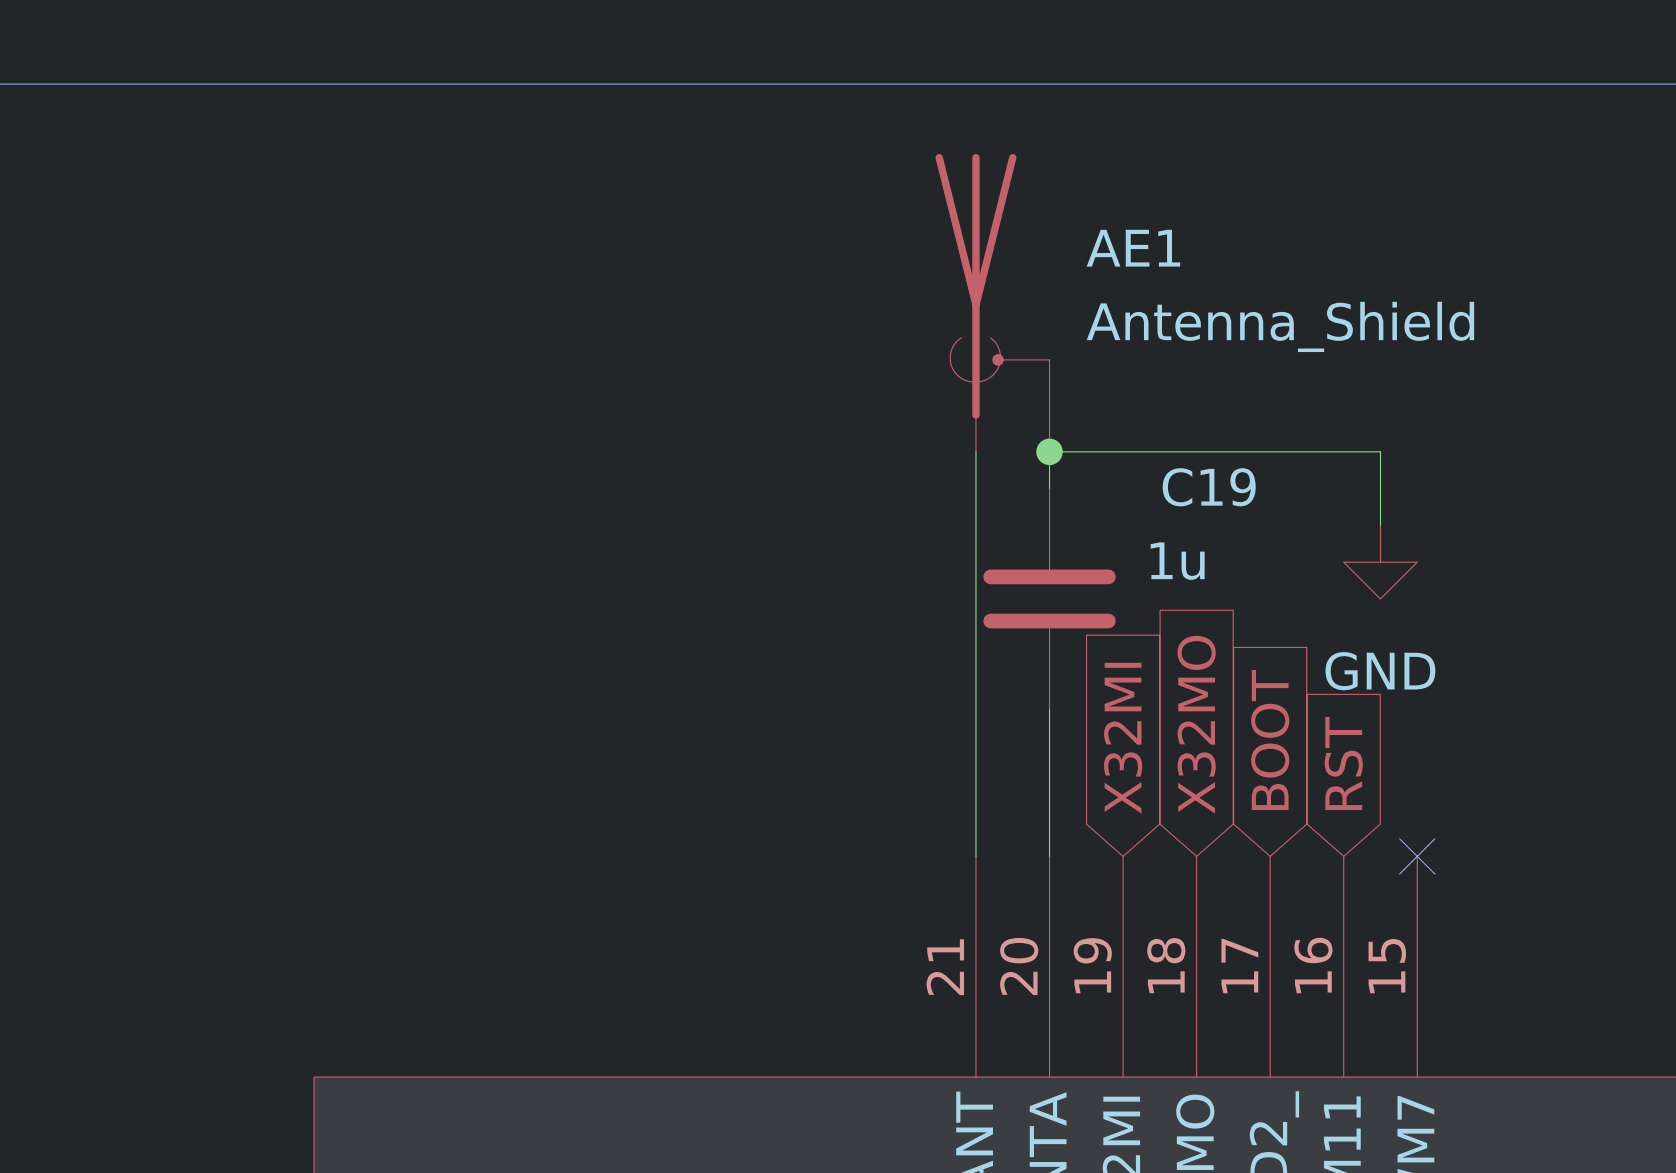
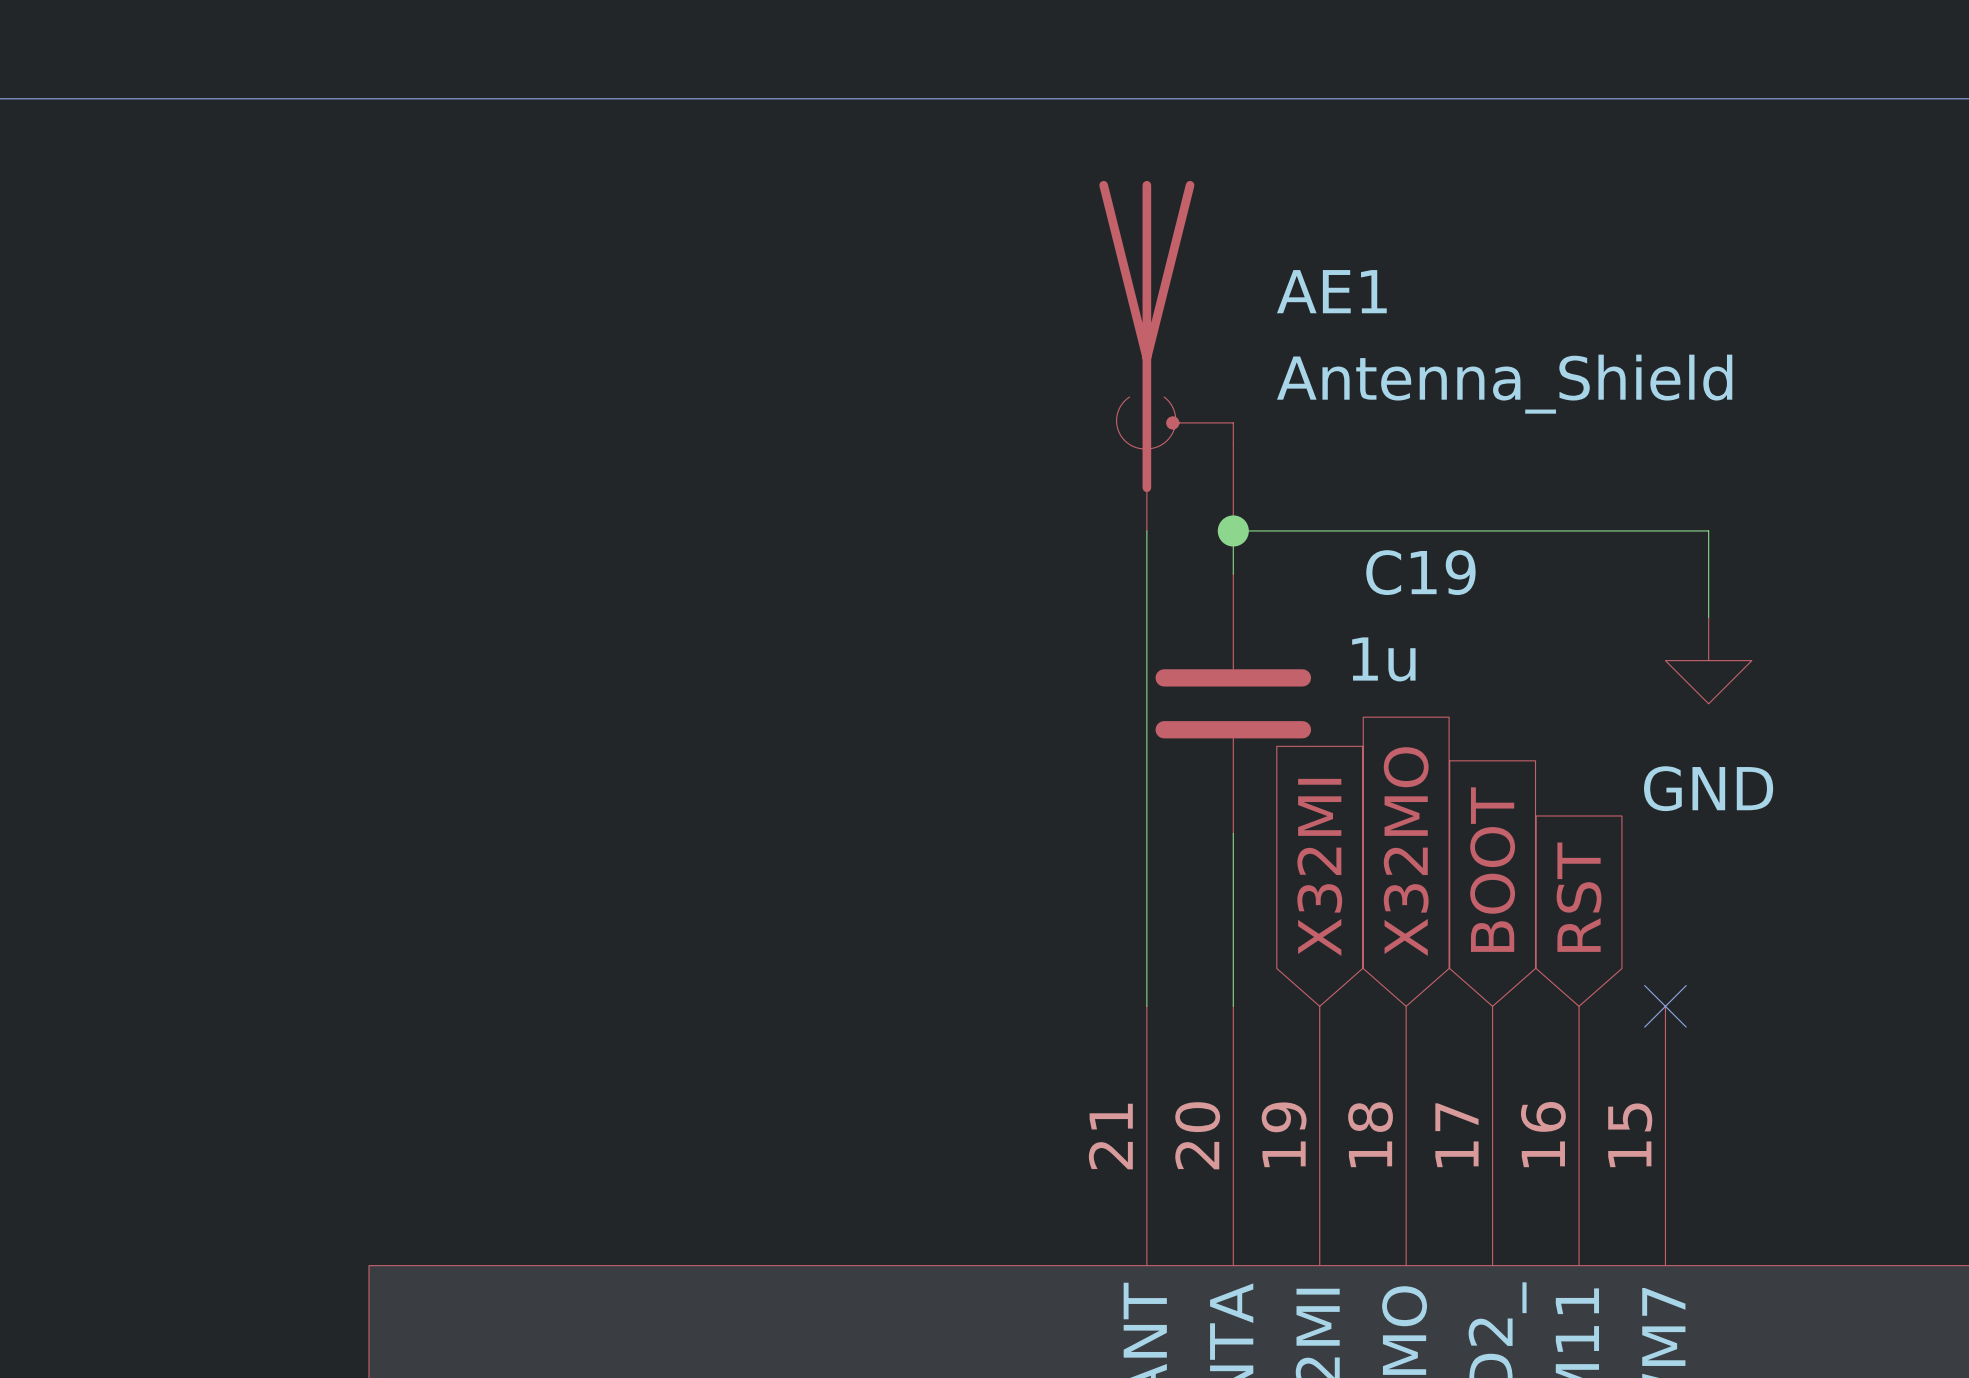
wire: (1380, 451) (1380, 525) -> (1622, 530) (1708, 530) (1708, 617)
power symbol position: GND (1380, 562) -> GND (1708, 660)

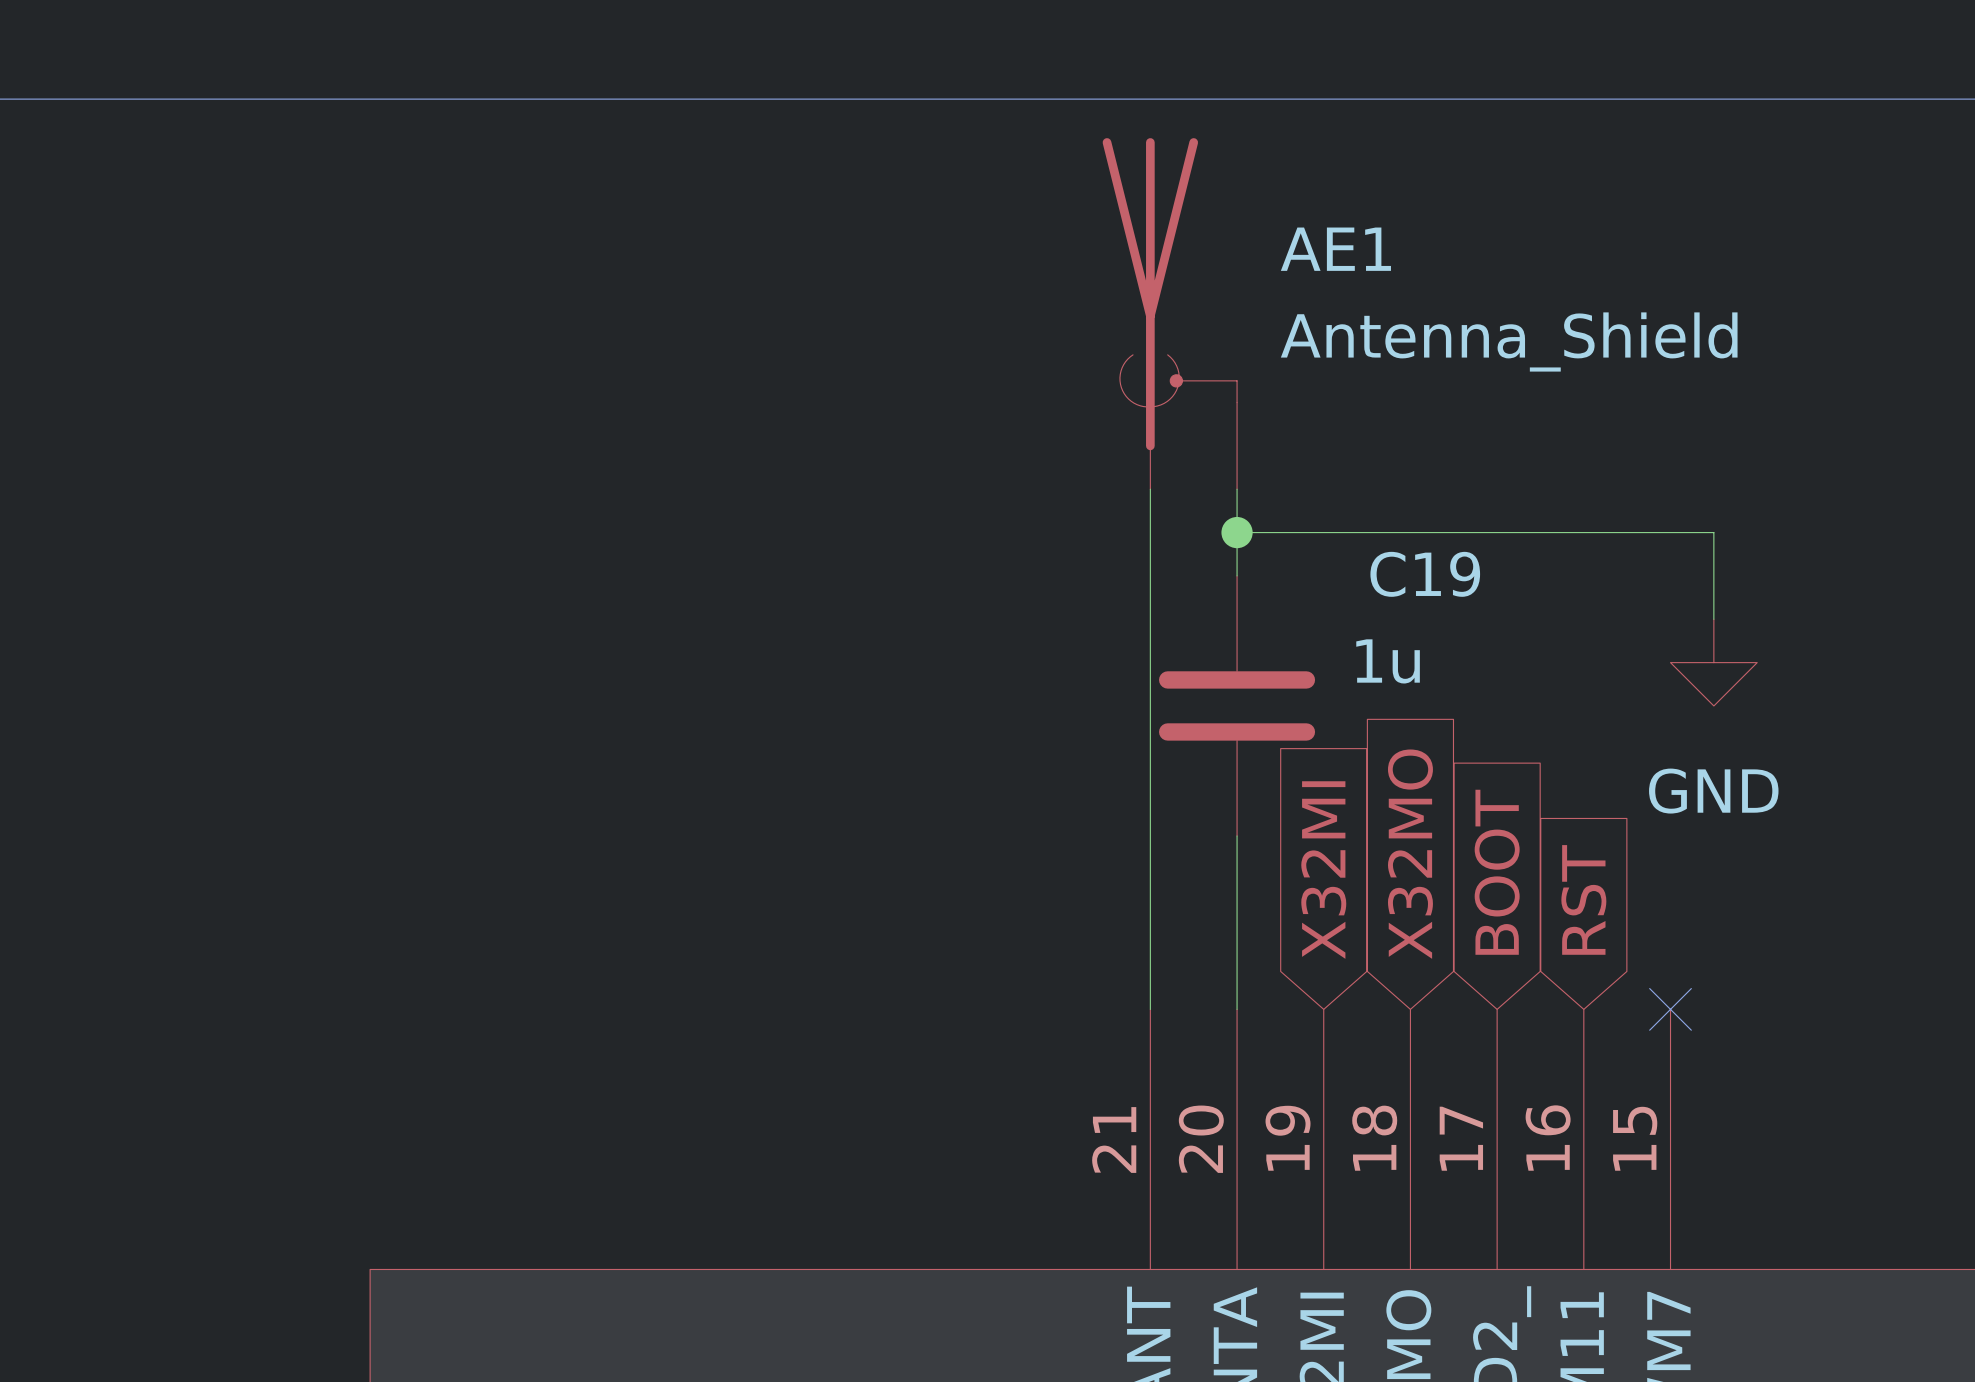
AE1 position: (1166, 355) -> (1169, 313)

